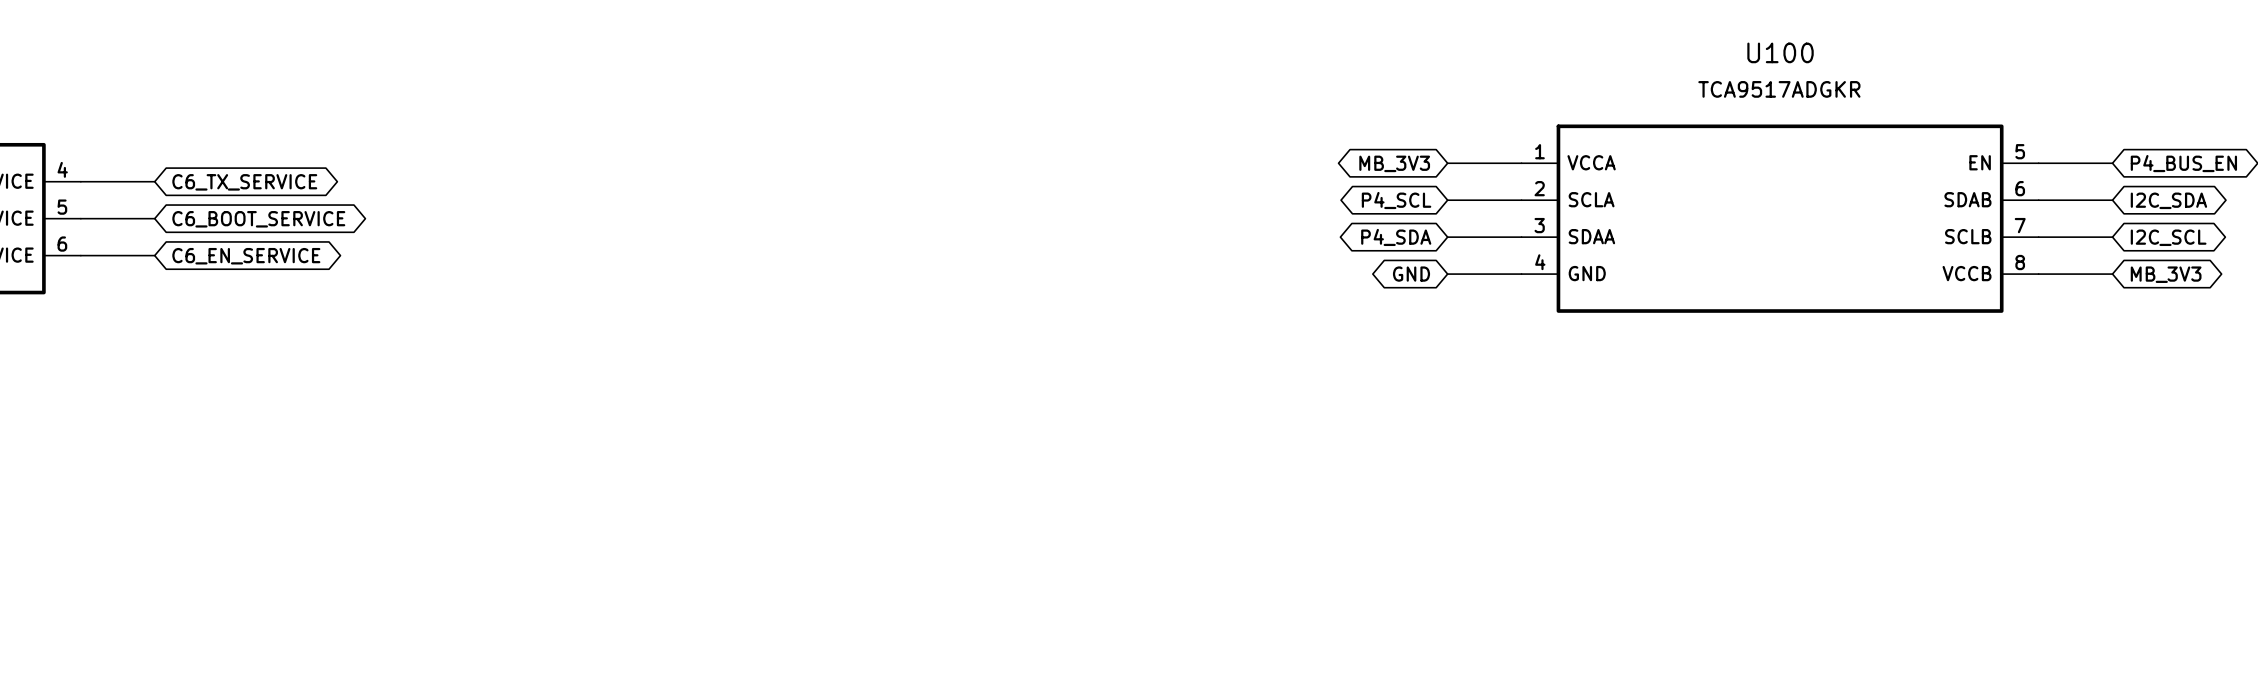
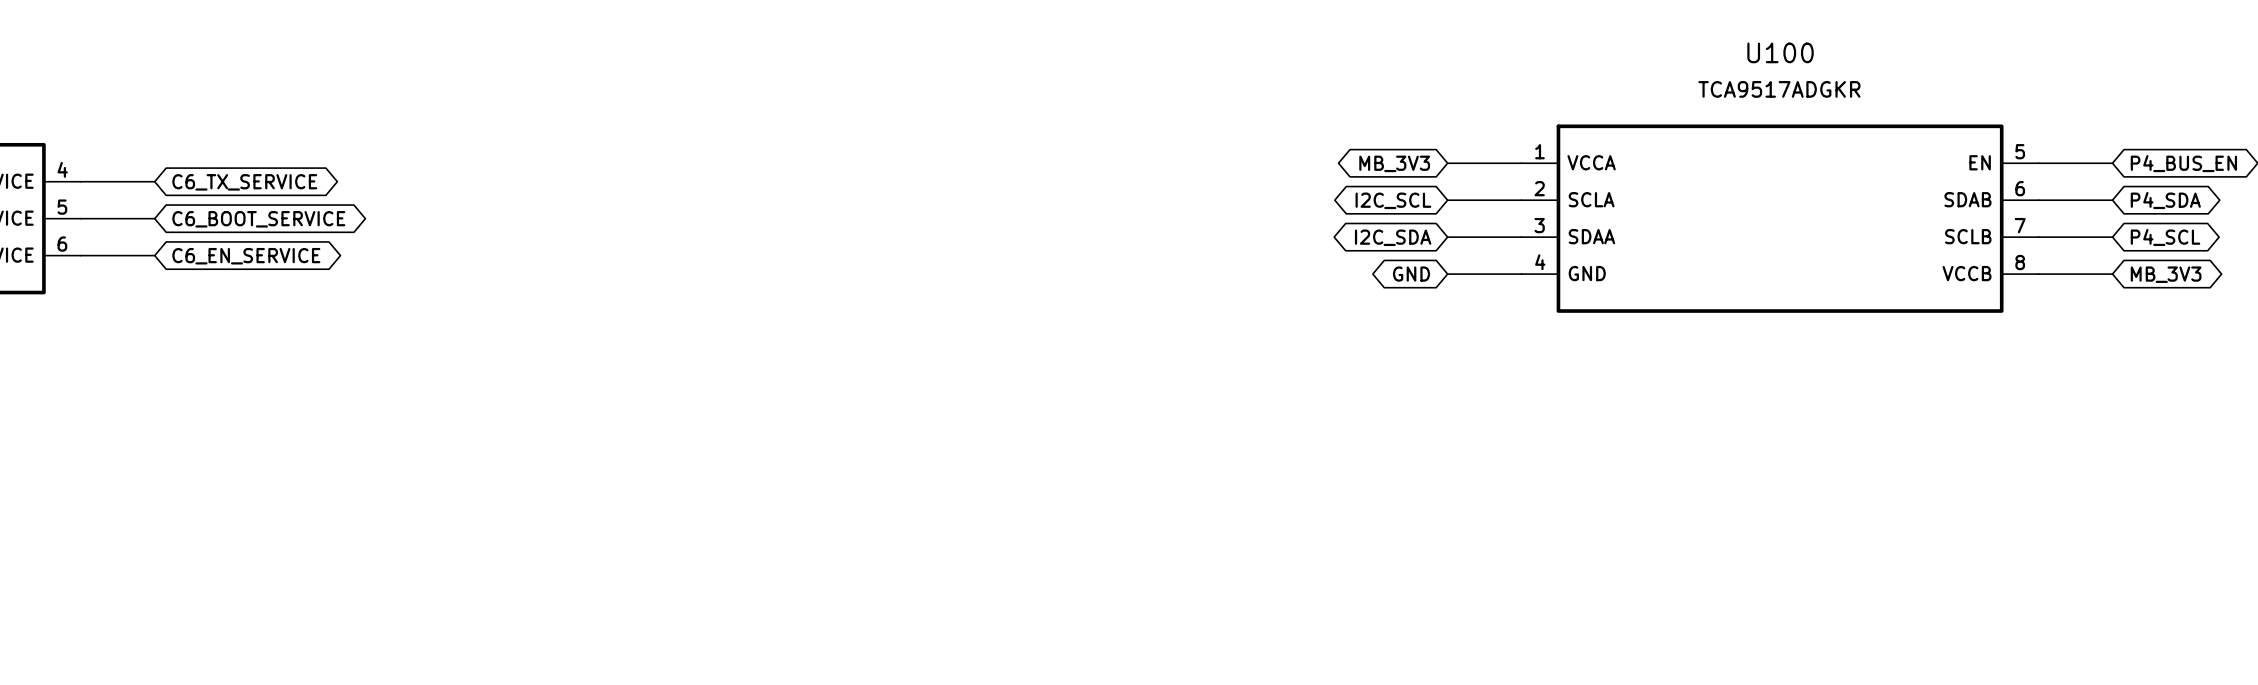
global label: P4_SCL (1396, 200) -> I2C_SCL (1393, 200)
global label: I2C_SDA (2168, 200) -> P4_SDA (2165, 200)
global label: P4_SDA (1396, 237) -> I2C_SDA (1393, 237)
global label: I2C_SCL (2168, 237) -> P4_SCL (2165, 237)

